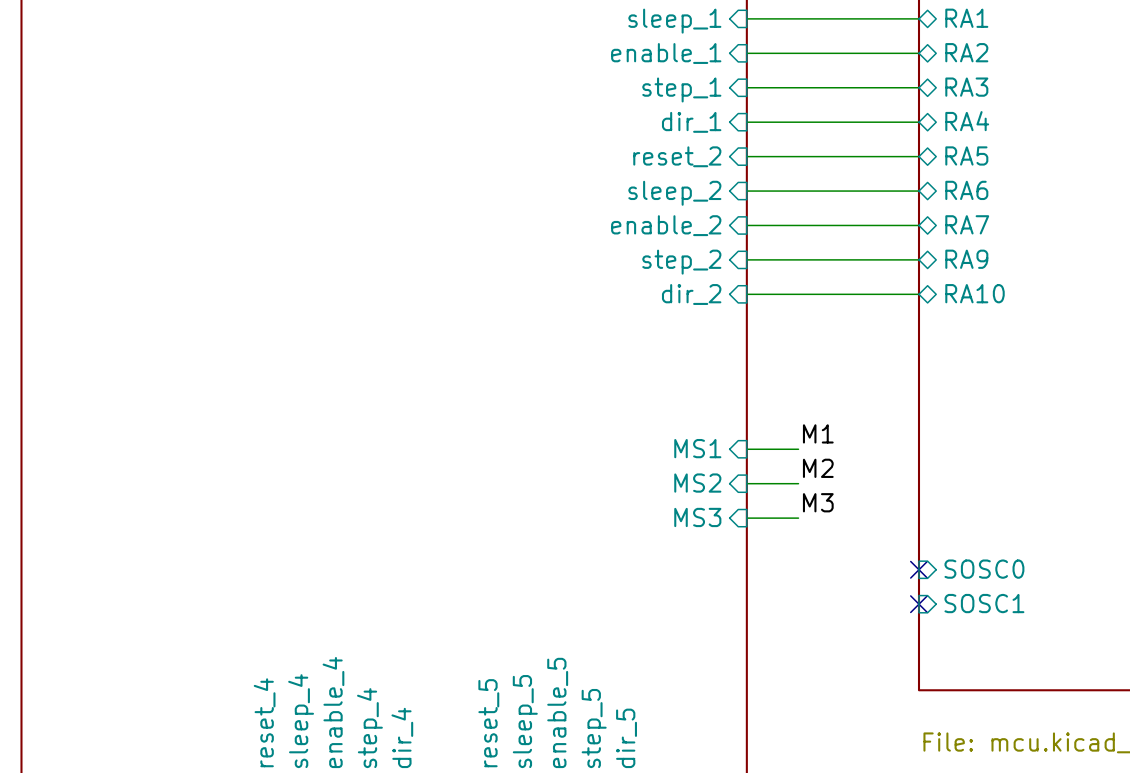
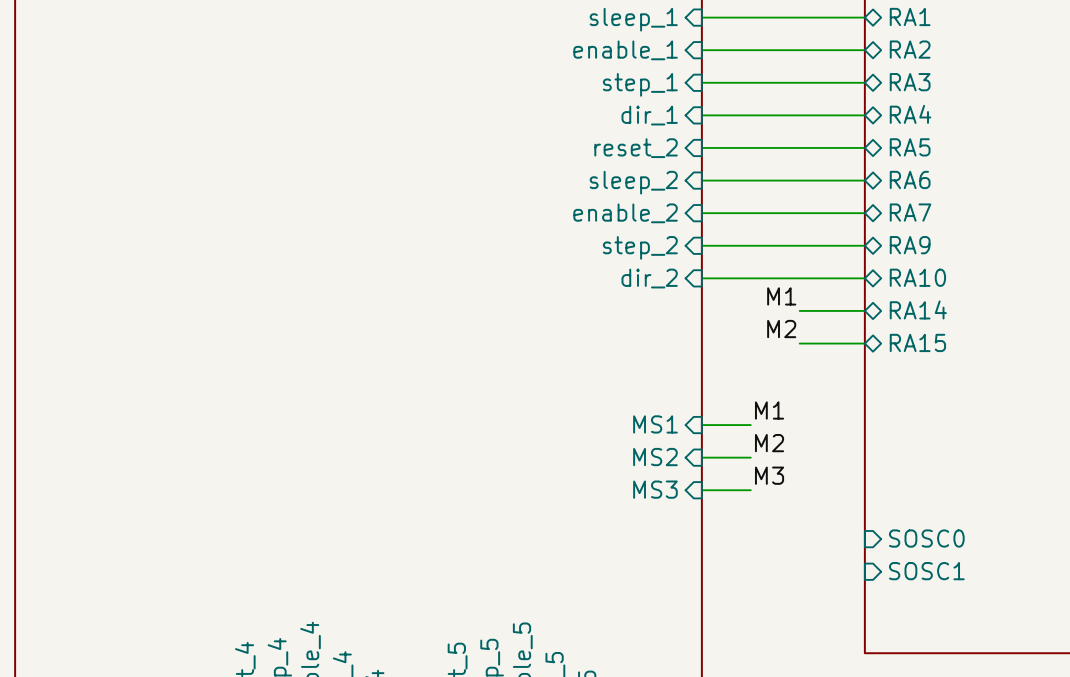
label: none -> M1 (781, 296)
sheet pin: none -> RA14 (918, 309)
wire: none -> (799, 310) (864, 310)
label: none -> M2 (781, 329)
sheet pin: none -> RA15 (917, 342)
wire: none -> (799, 343) (864, 343)
no-connect mark: (919, 569) -> none
no-connect mark: (919, 604) -> none

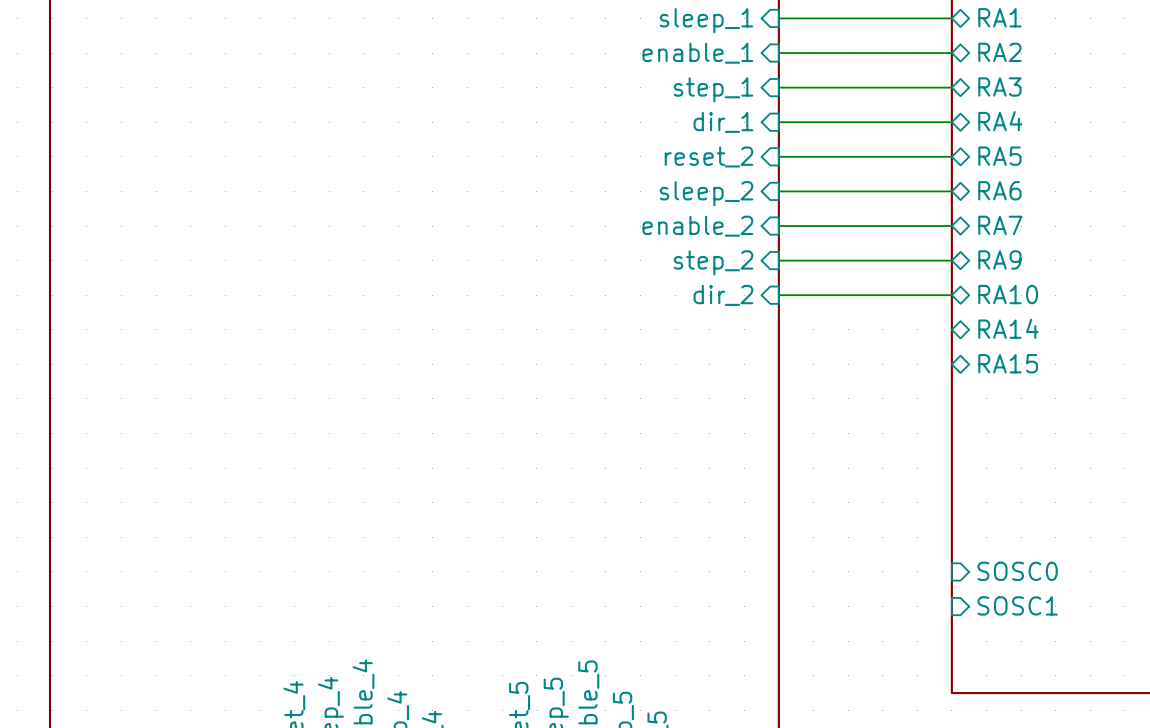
label: M1 (781, 296) -> none
wire: (799, 310) (864, 310) -> none
label: M2 (781, 329) -> none
wire: (799, 343) (864, 343) -> none
label: M1 (769, 410) -> none
sheet pin: MS1 (655, 424) -> none
wire: (701, 425) (750, 425) -> none
label: M2 (769, 443) -> none
sheet pin: MS2 (655, 457) -> none
wire: (701, 457) (750, 457) -> none
label: M3 (769, 475) -> none
sheet pin: MS3 (655, 489) -> none
wire: (701, 490) (750, 490) -> none

